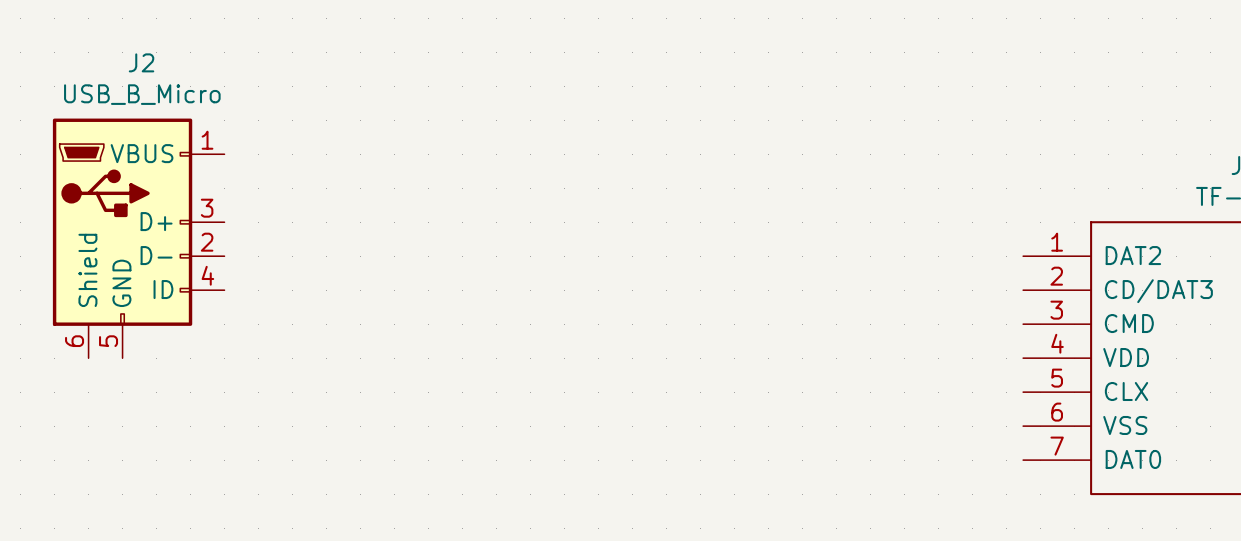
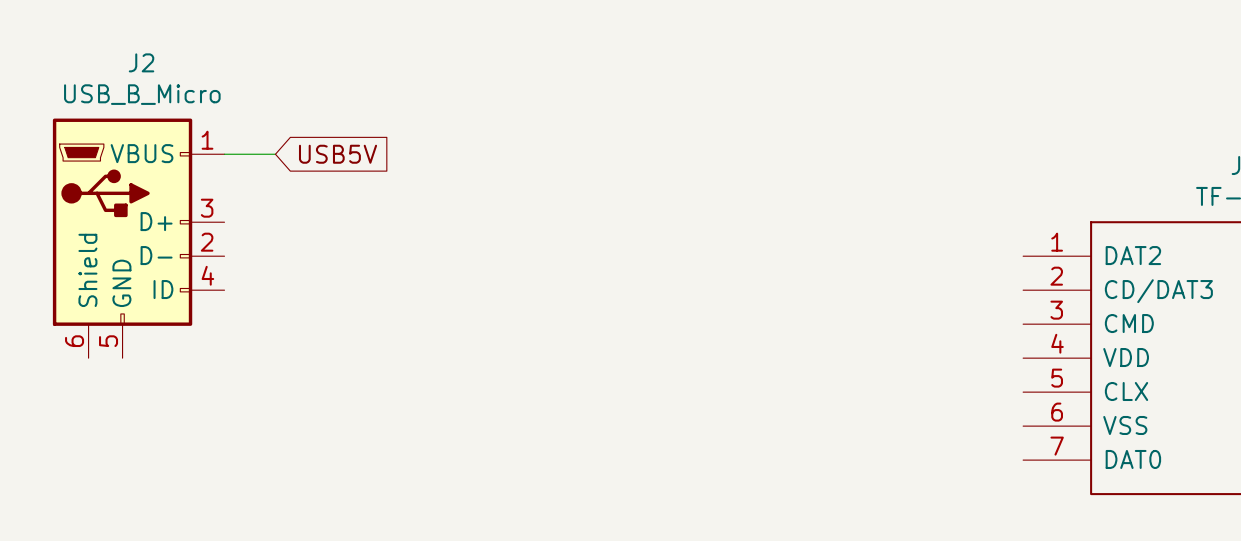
wire: none -> (224, 154) (275, 154)
global label: none -> USB5V (338, 154)

